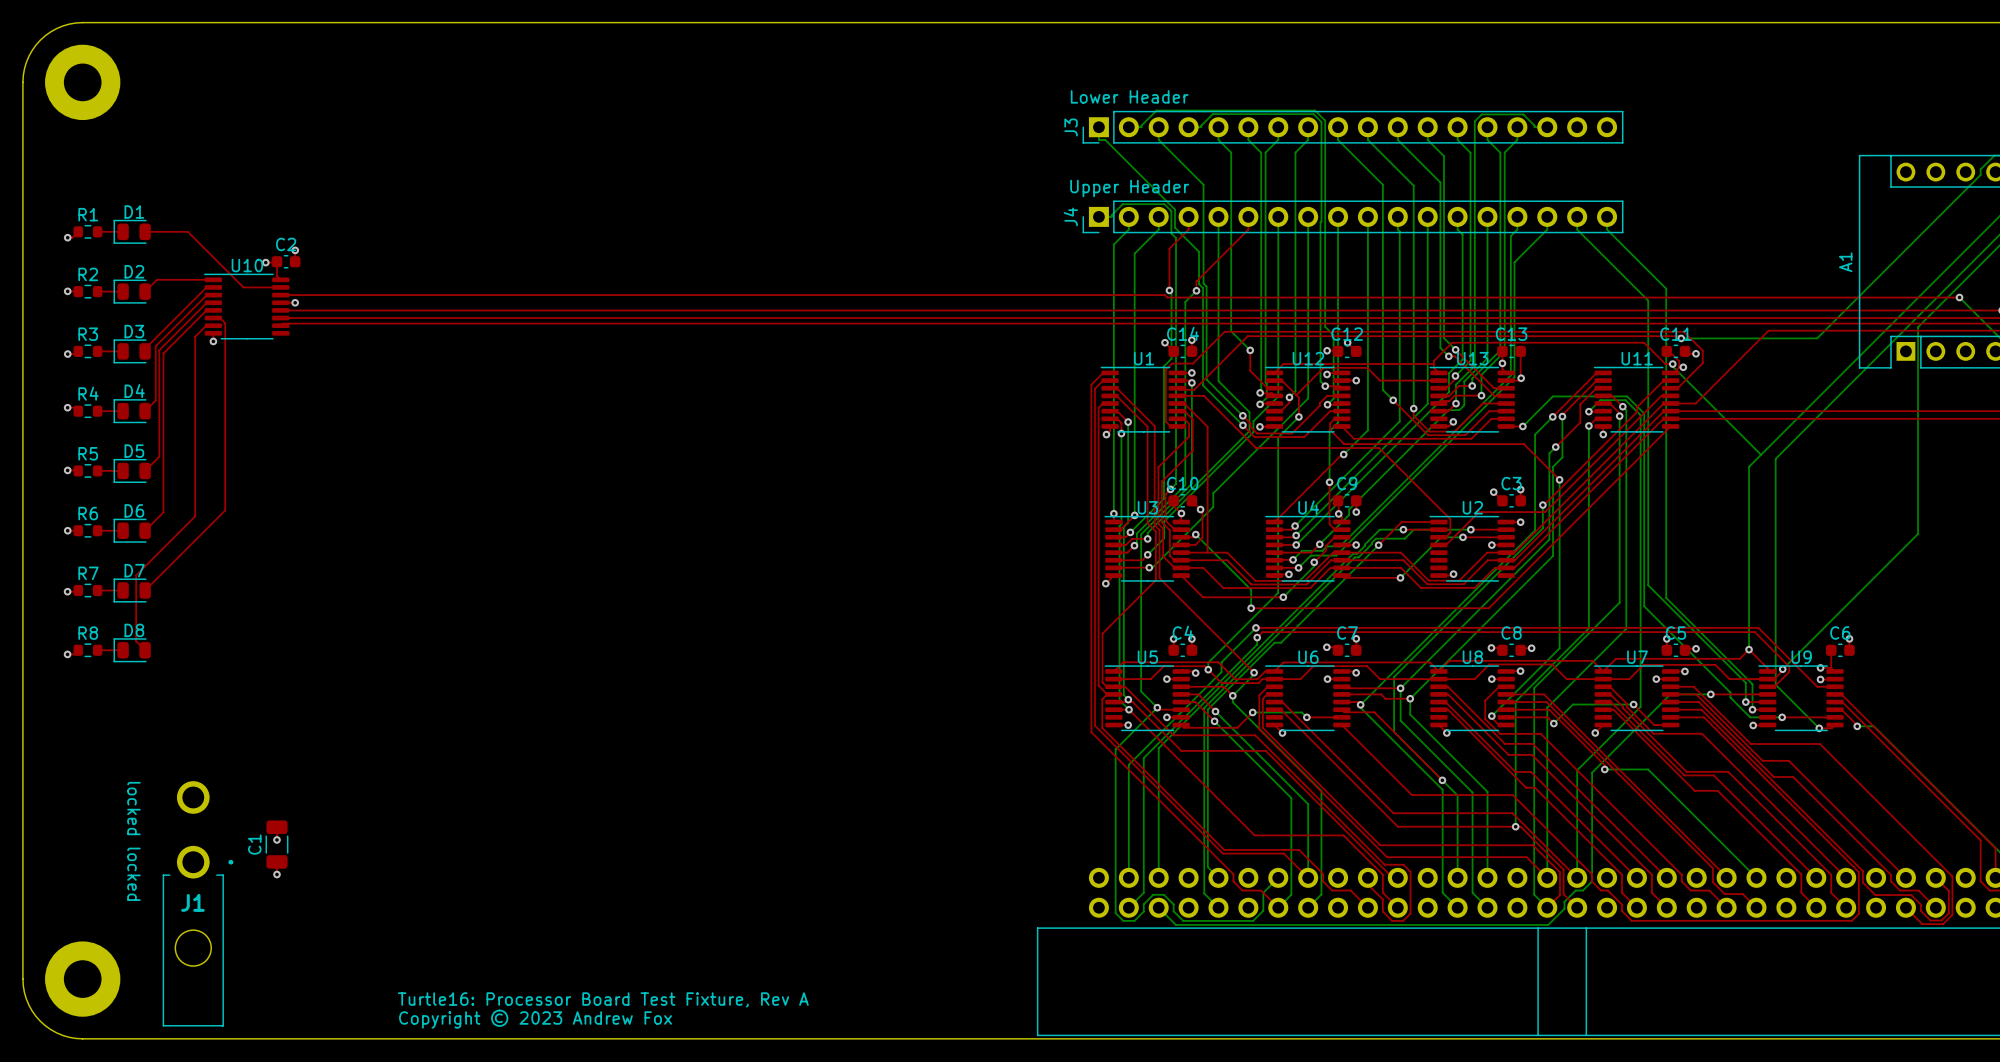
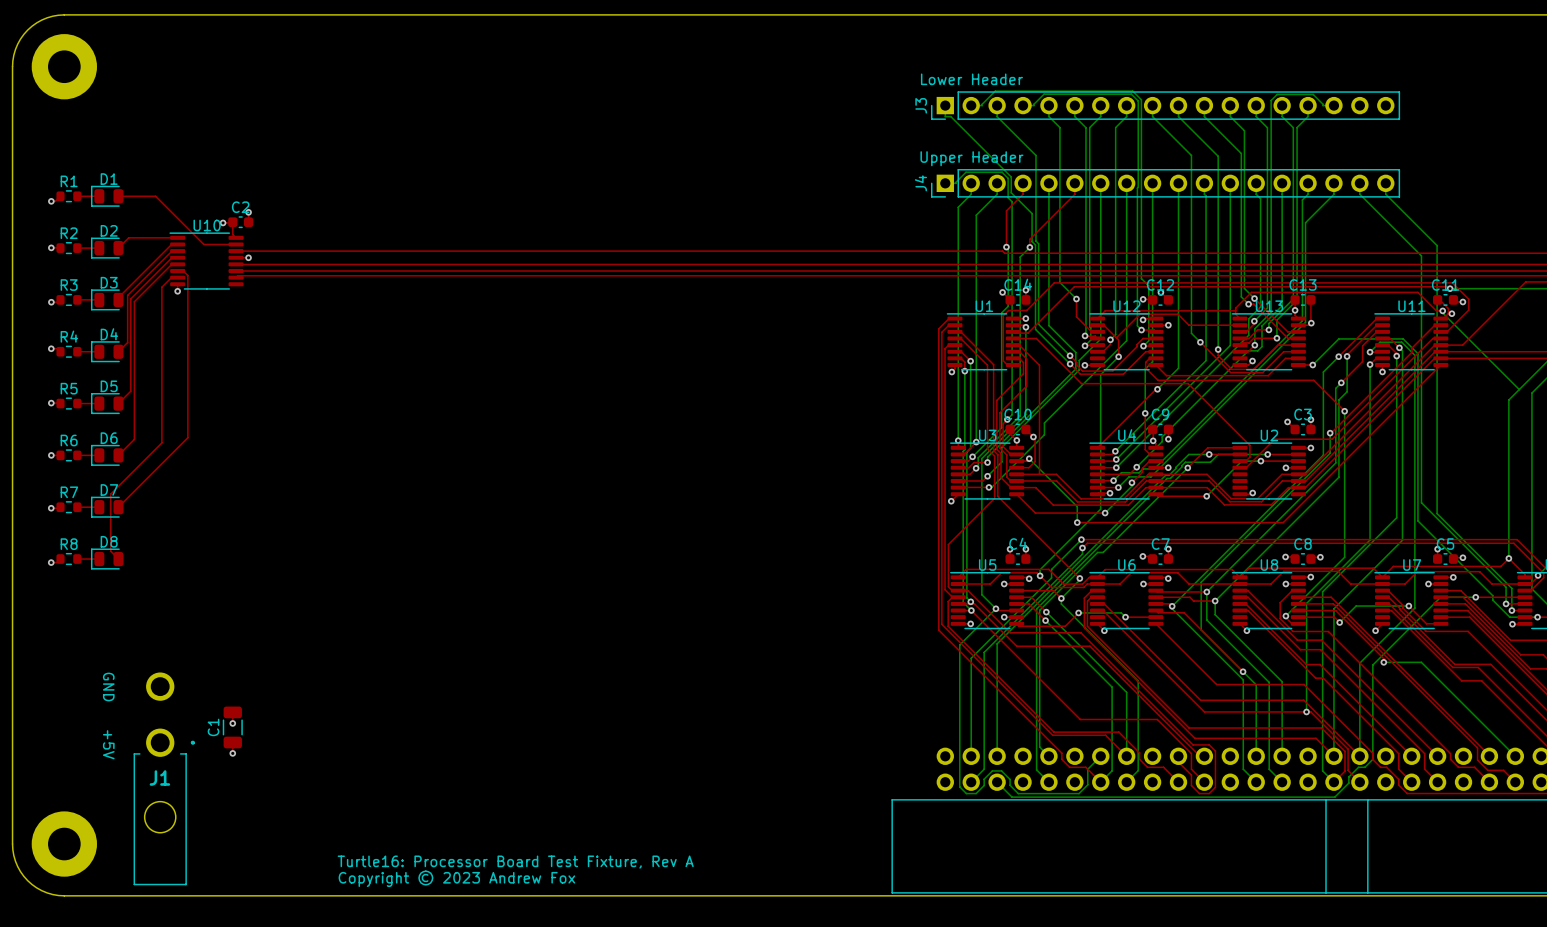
text: locked (133, 808) -> GND (108, 686)
text: locked (133, 874) -> +5V (108, 744)

